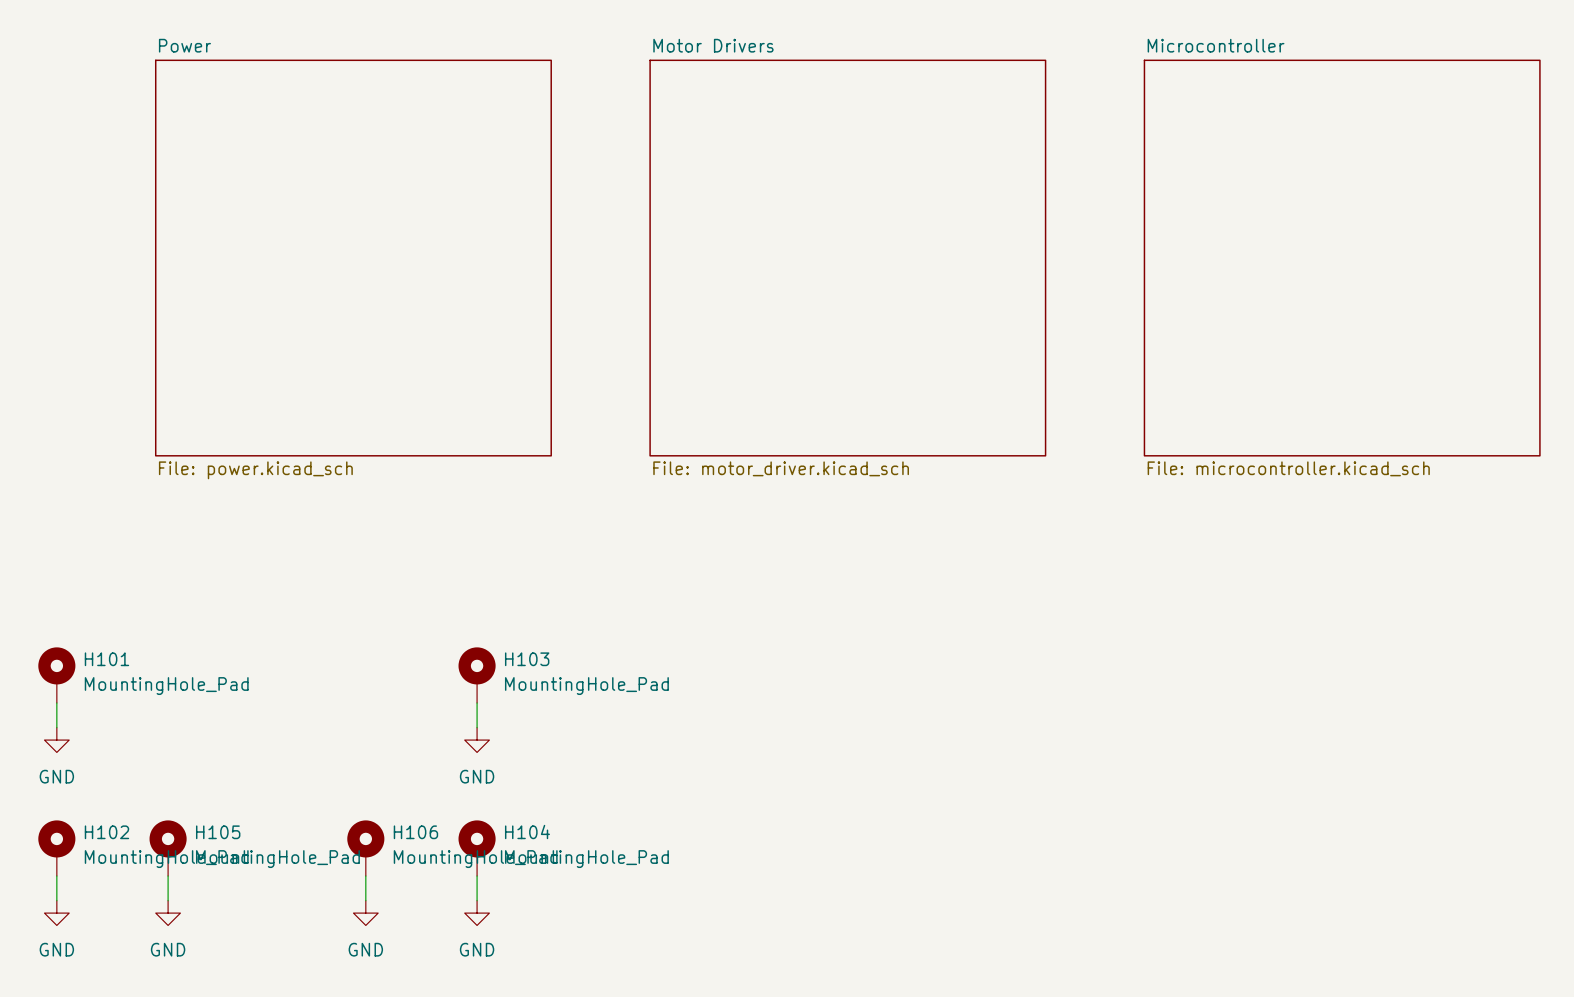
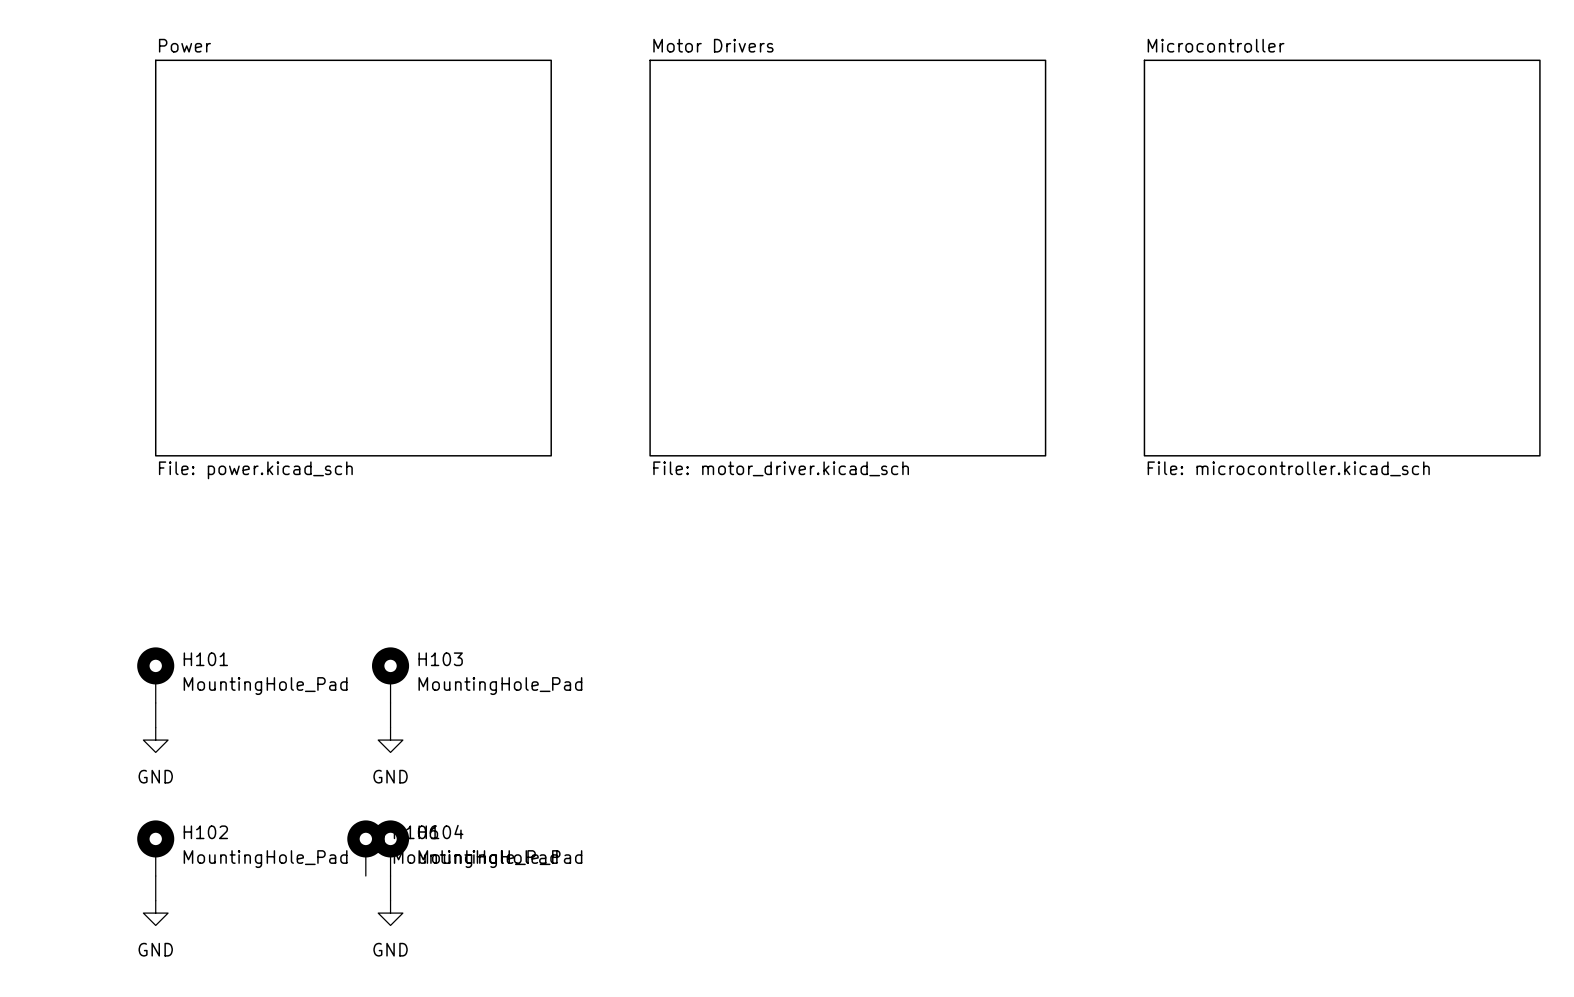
H101 position: (56, 675) -> (155, 675)
H103 position: (477, 675) -> (390, 675)
wire: (56, 702) (56, 727) -> (155, 702) (155, 727)
wire: (477, 702) (477, 727) -> (390, 702) (390, 727)
power symbol: GND (56, 740) -> none
power symbol: none -> GND (155, 740)
power symbol position: GND (477, 740) -> GND (390, 740)
H102 position: (56, 848) -> (155, 848)
H105: MountingHole_Pad (168, 848) -> none
H104 position: (477, 848) -> (390, 848)
wire: (56, 876) (56, 900) -> (155, 876) (155, 900)
wire: (168, 876) (168, 900) -> none
wire: (365, 876) (365, 900) -> none
wire: (477, 876) (477, 900) -> (390, 876) (390, 900)
power symbol: GND (56, 913) -> none
power symbol position: GND (168, 913) -> GND (155, 913)
power symbol position: GND (365, 913) -> GND (390, 913)
power symbol: GND (477, 913) -> none

